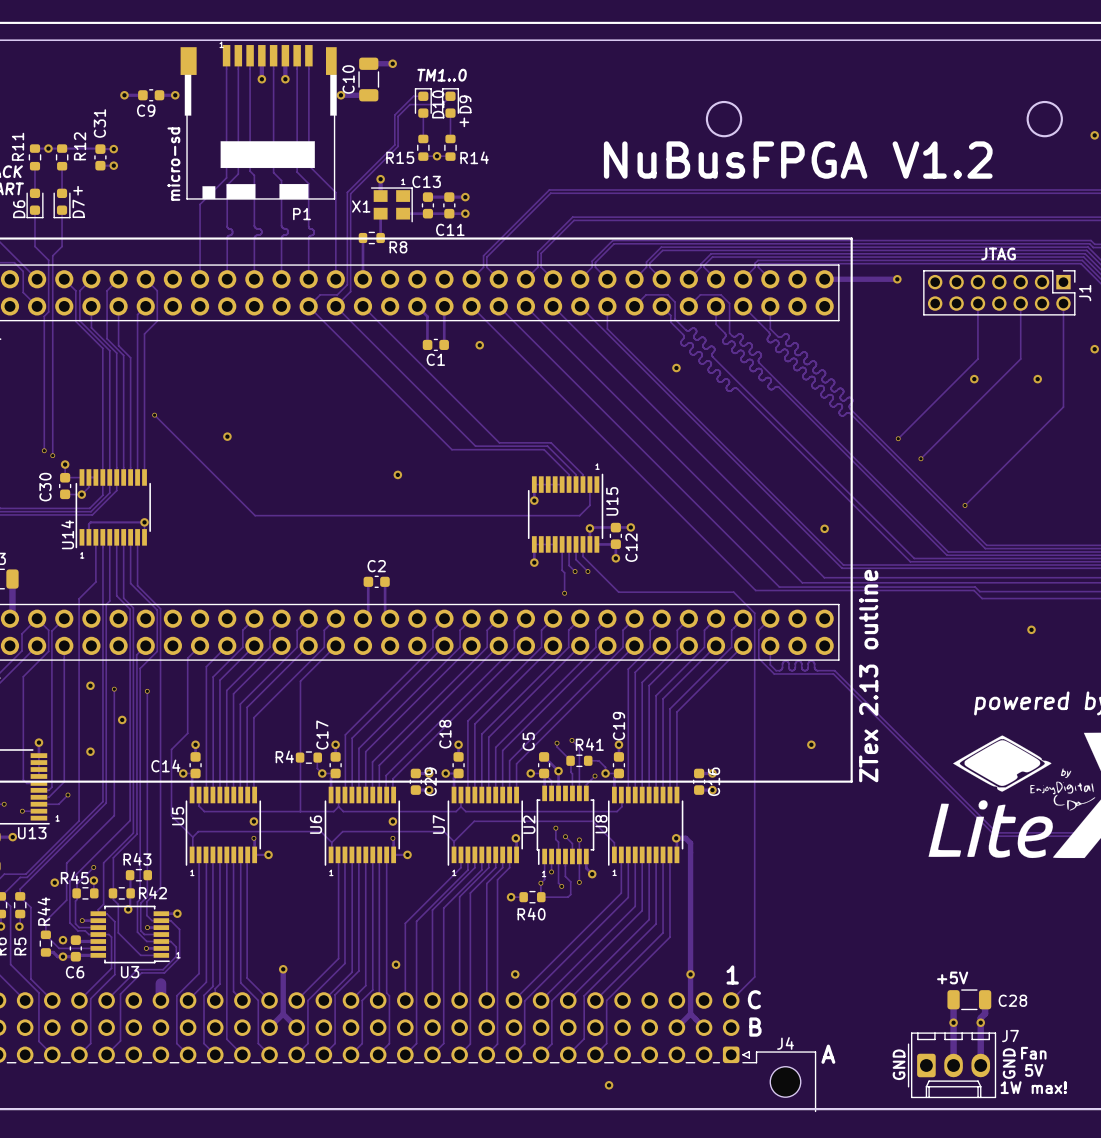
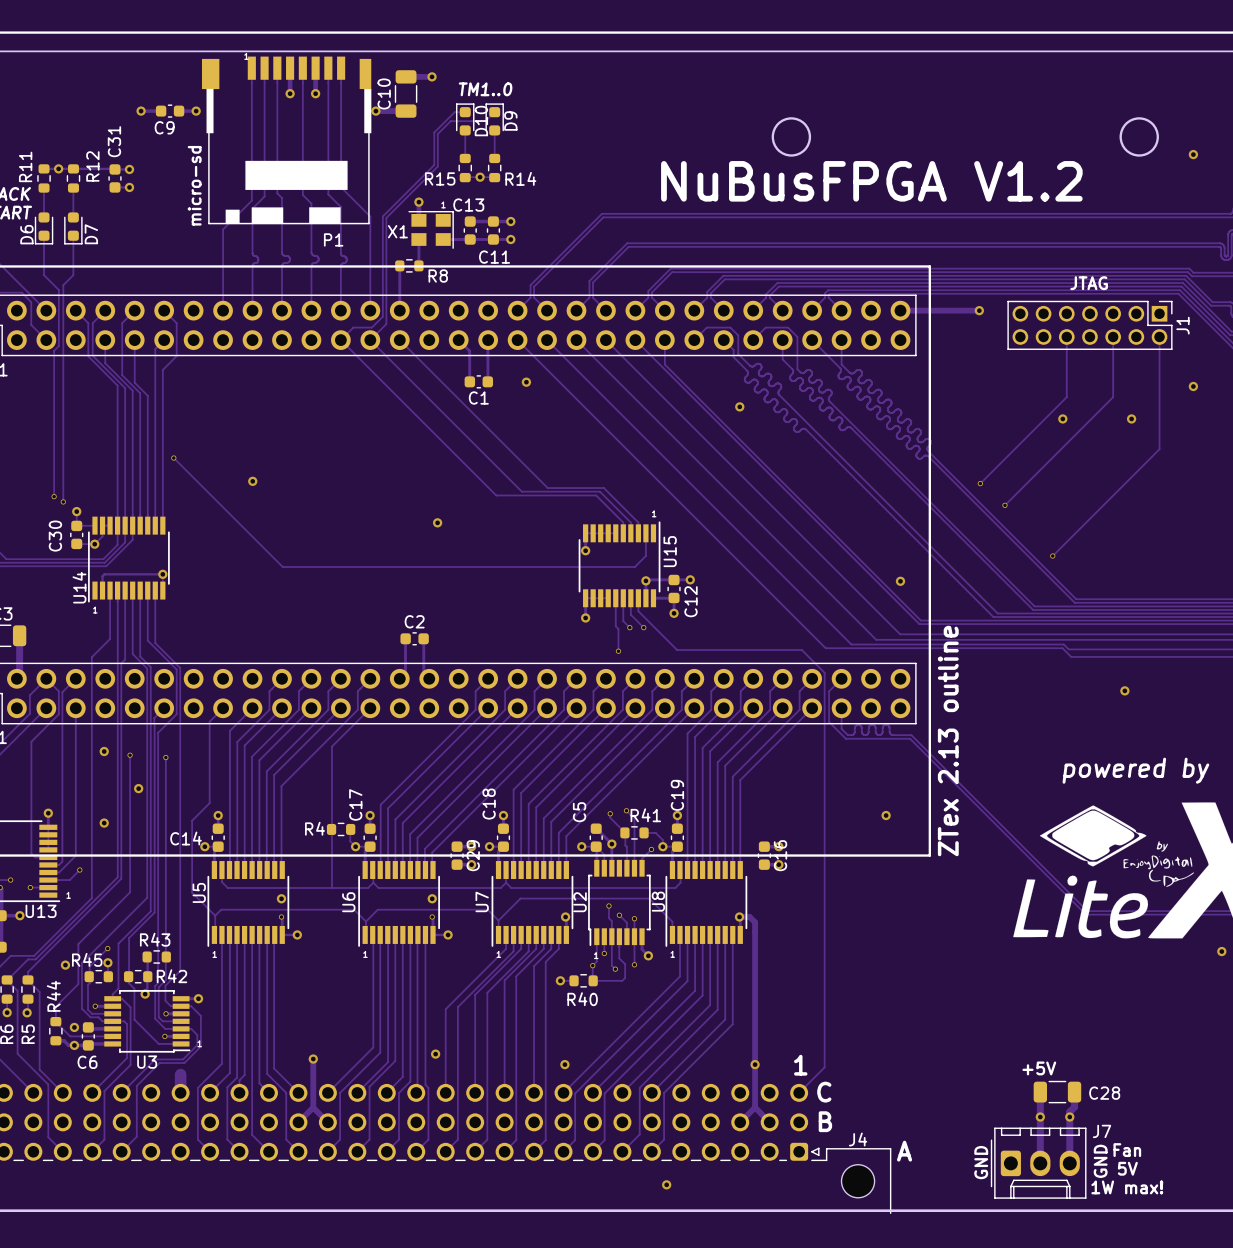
text: + (464, 122) -> none
text: + (78, 190) -> none

